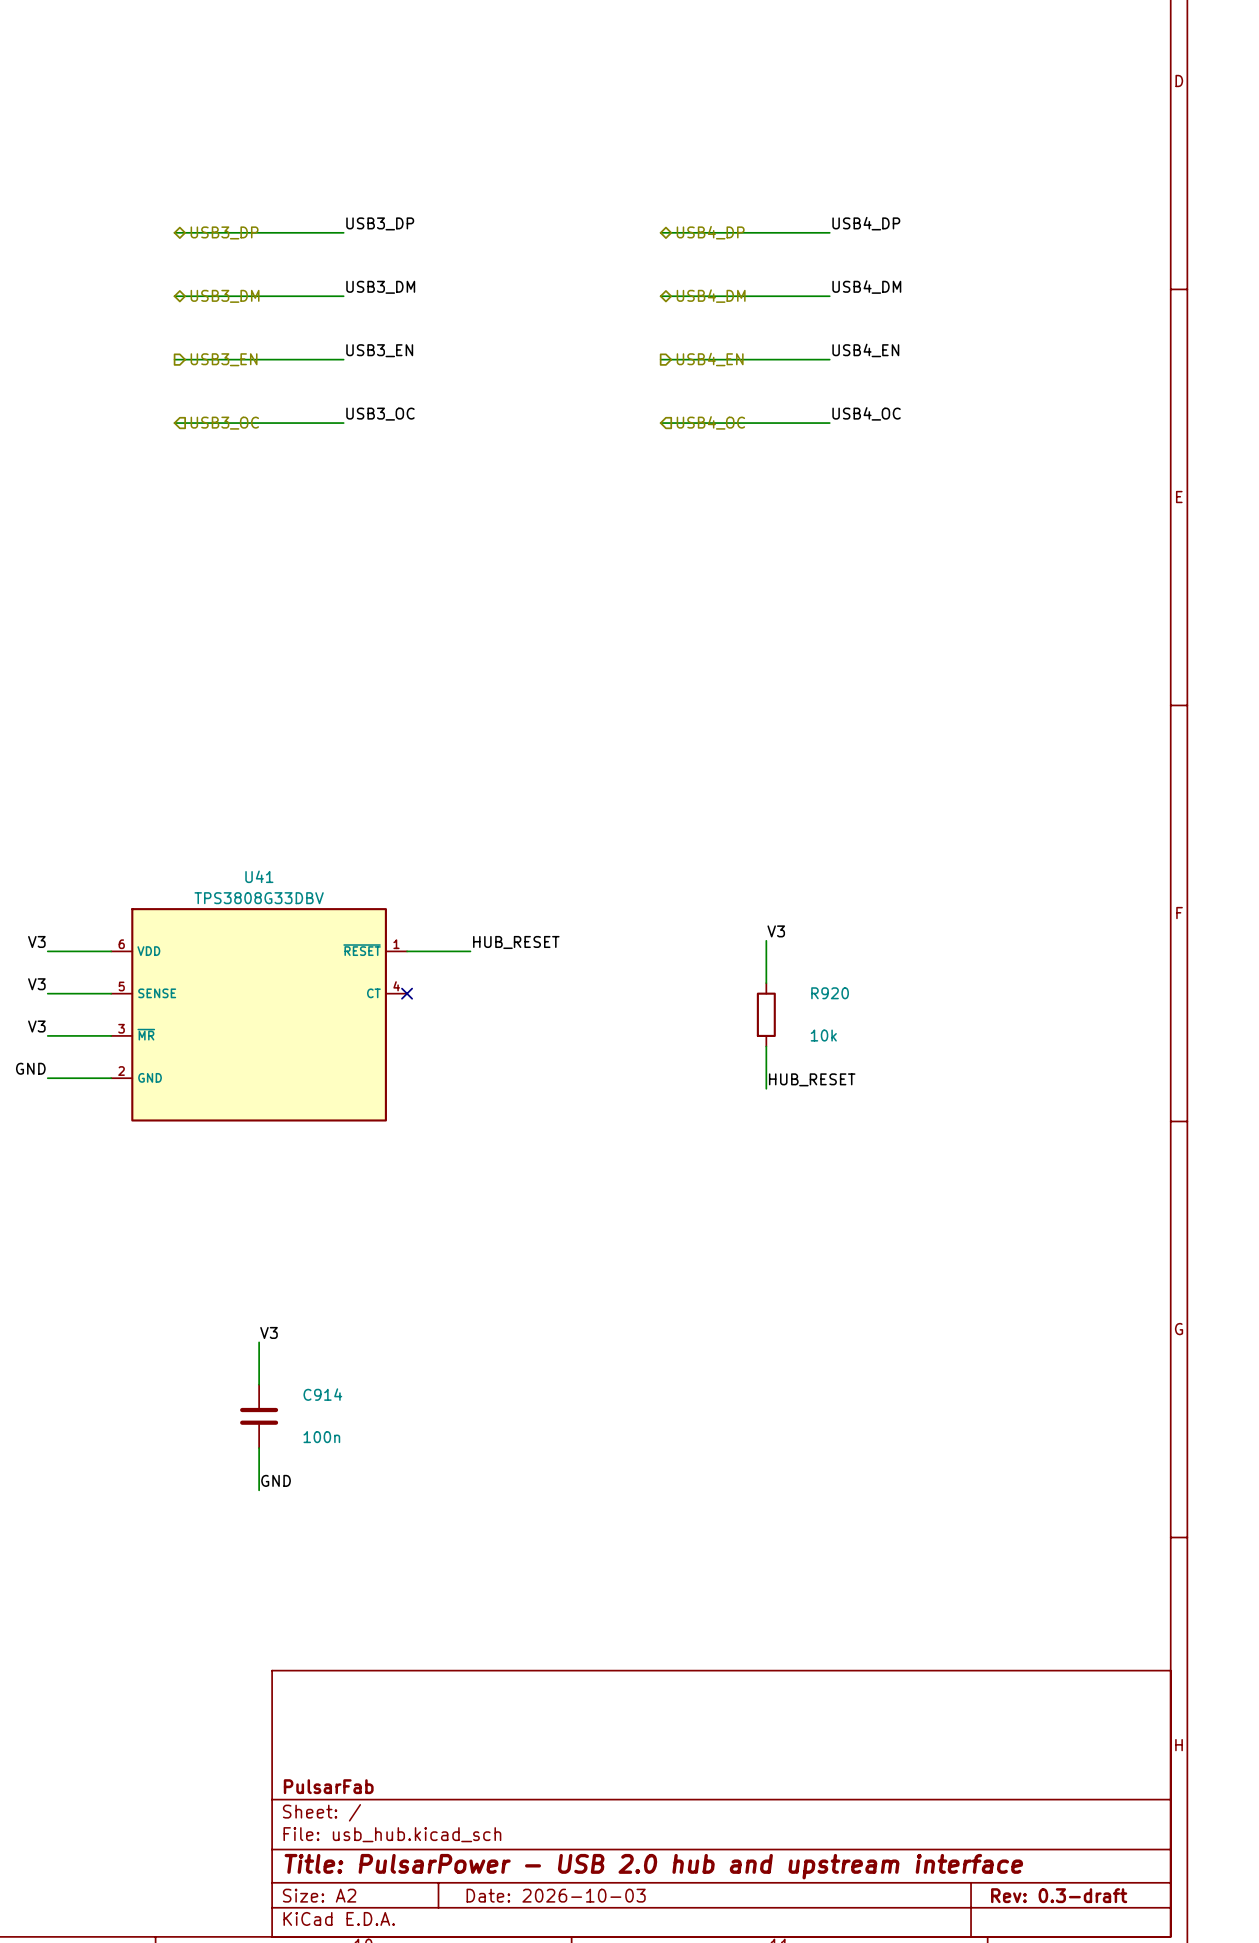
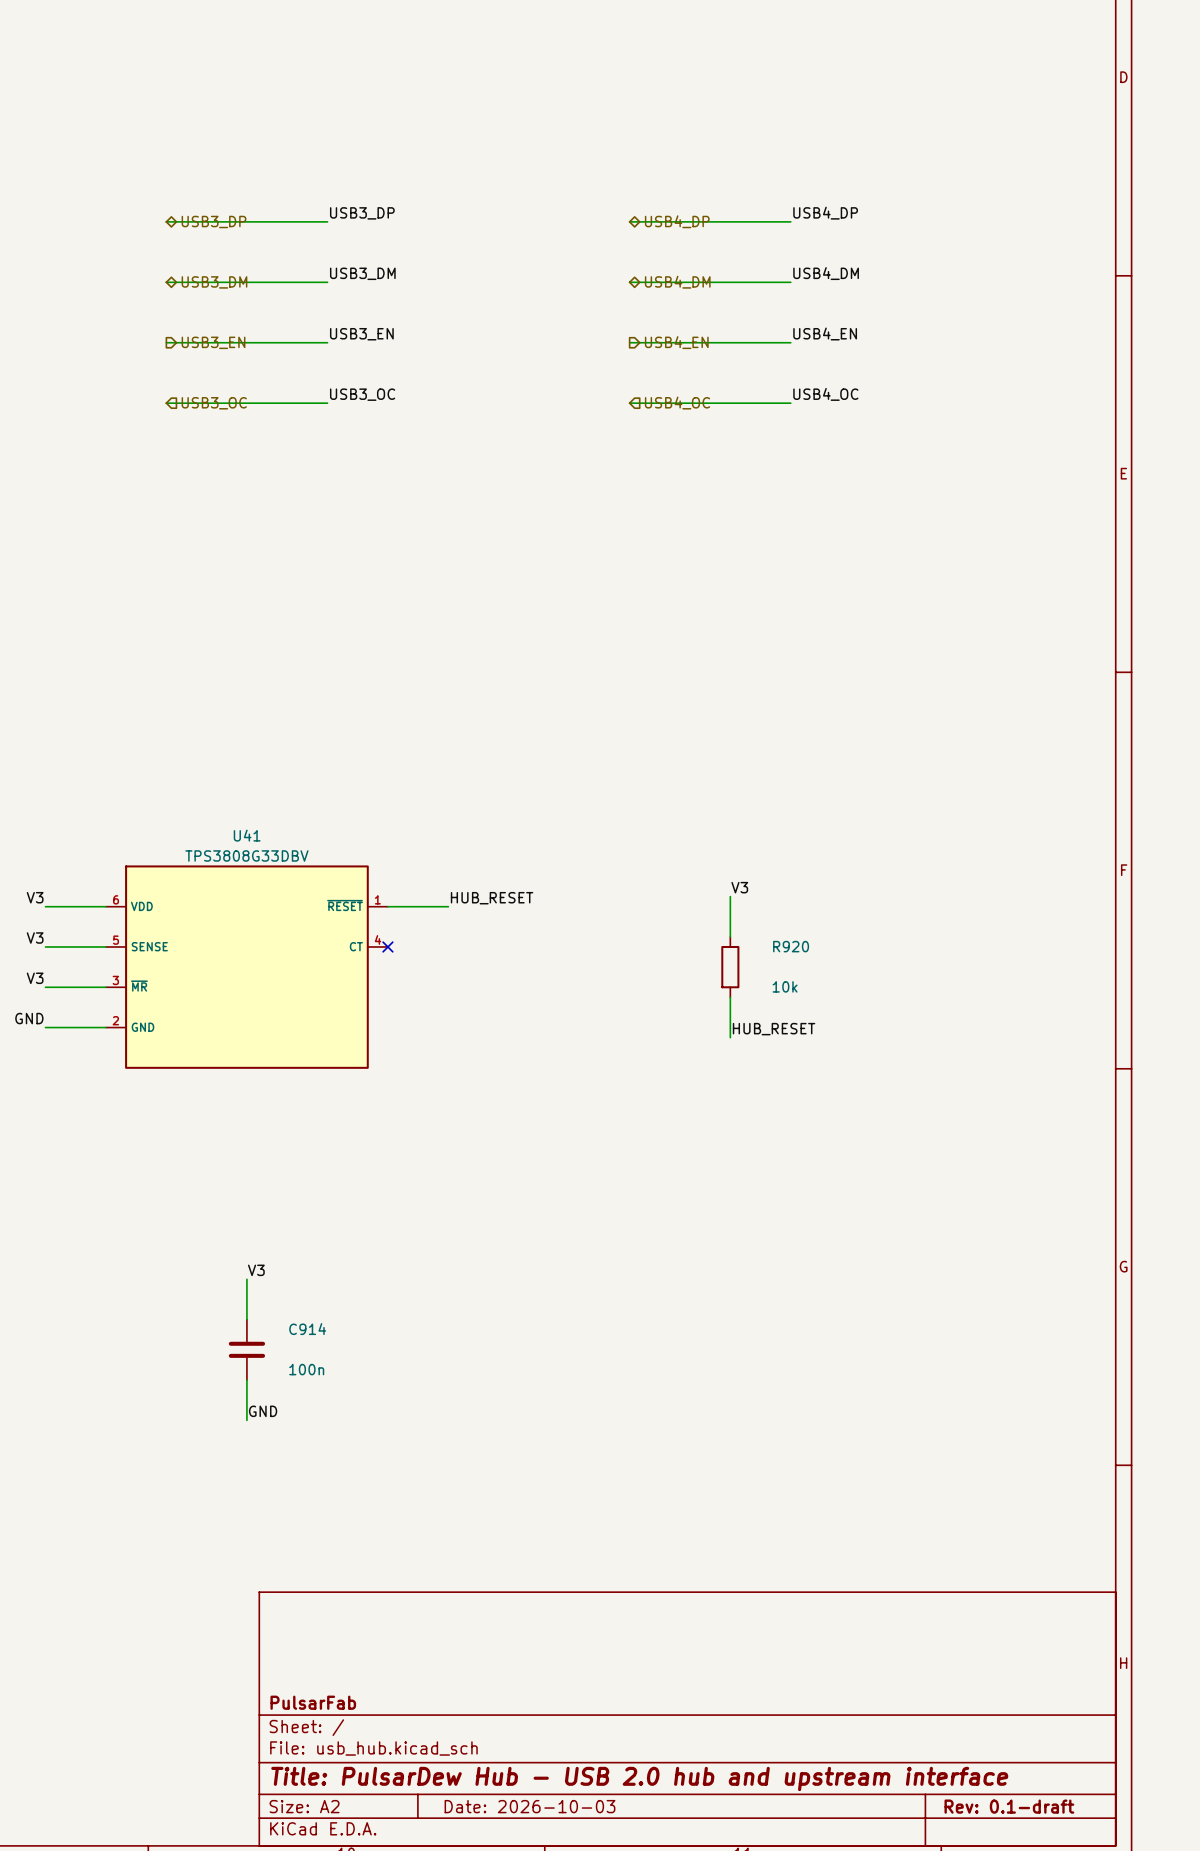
title block: Title: PulsarPower - USB 2.0 hub and upstream interface (653, 1866) -> Title: PulsarDew Hub - USB 2.0 hub and upstream interface (639, 1778)
title block: Rev: 0.3-draft (1059, 1895) -> Rev: 0.1-draft (1009, 1806)

